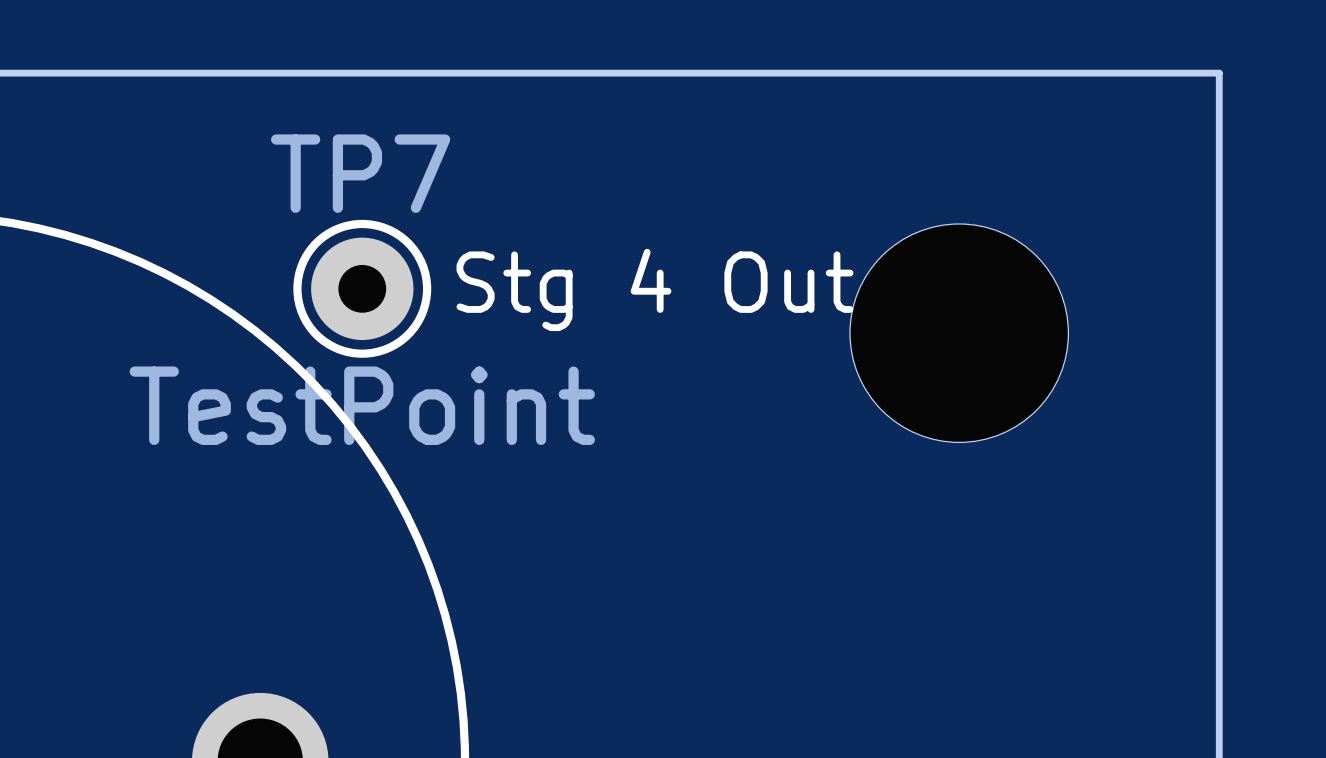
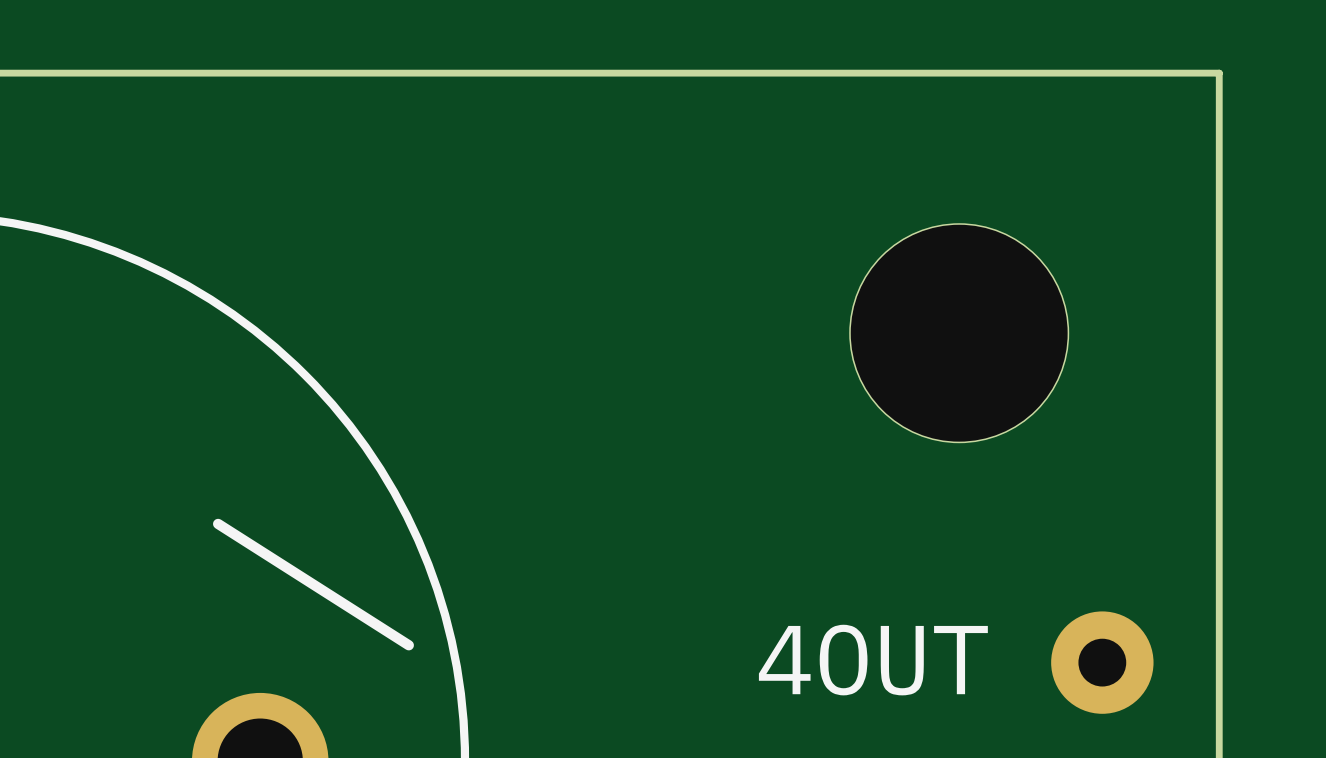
TP7 side: bottom (362, 288) -> top (1102, 662)
line: none -> (218, 523) (408, 645)
text: none -> 4OUT (873, 660)

